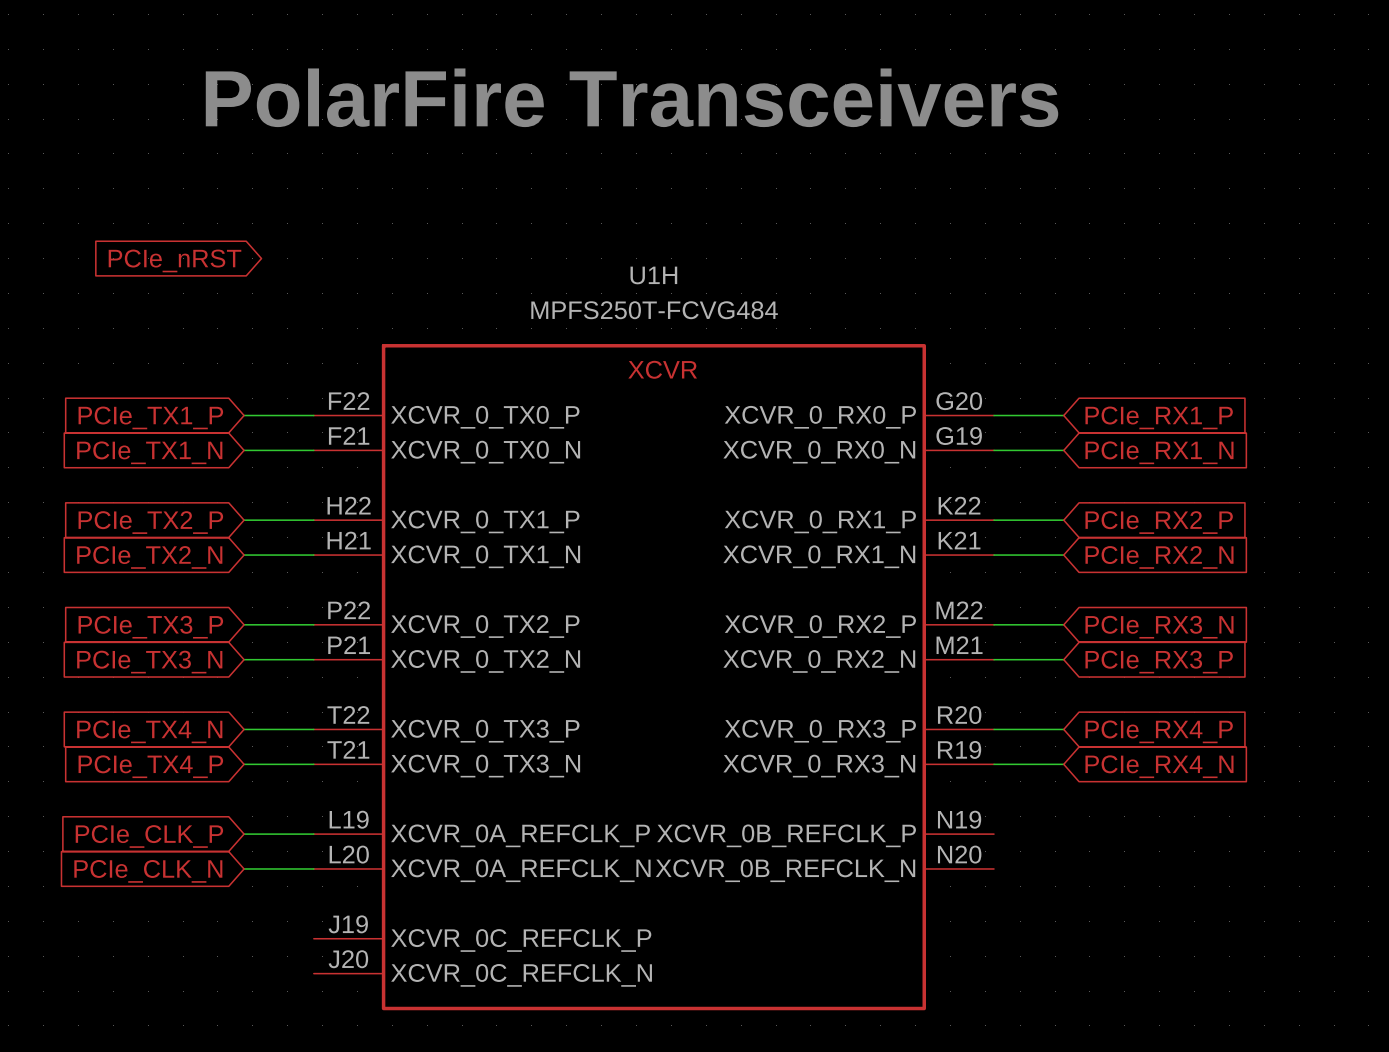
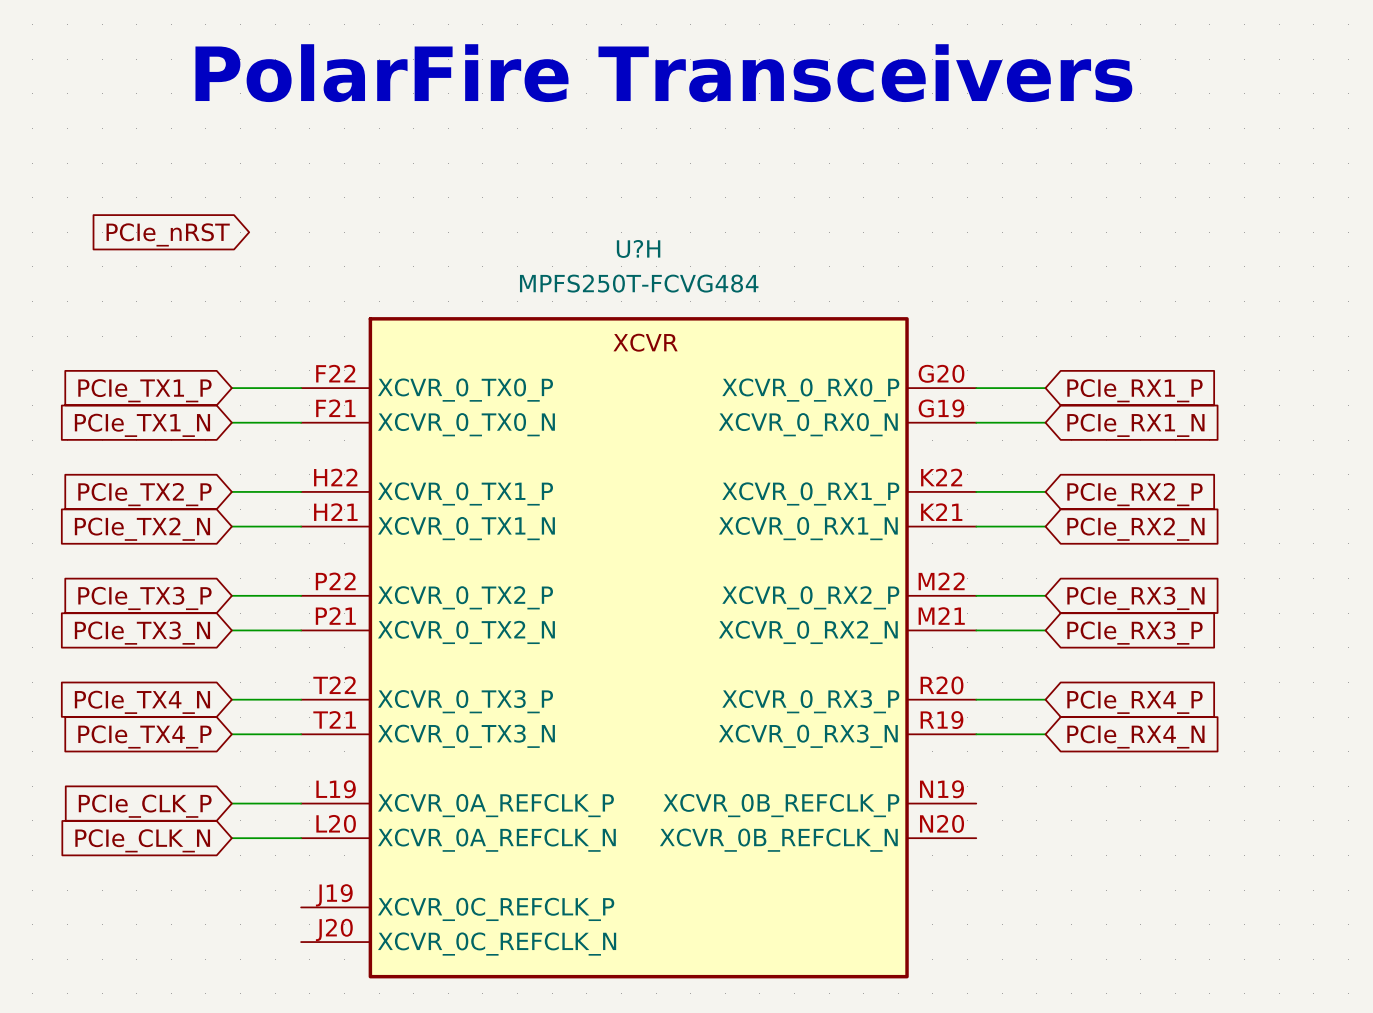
U1H name: U1H (653, 275) -> U?H (638, 248)

